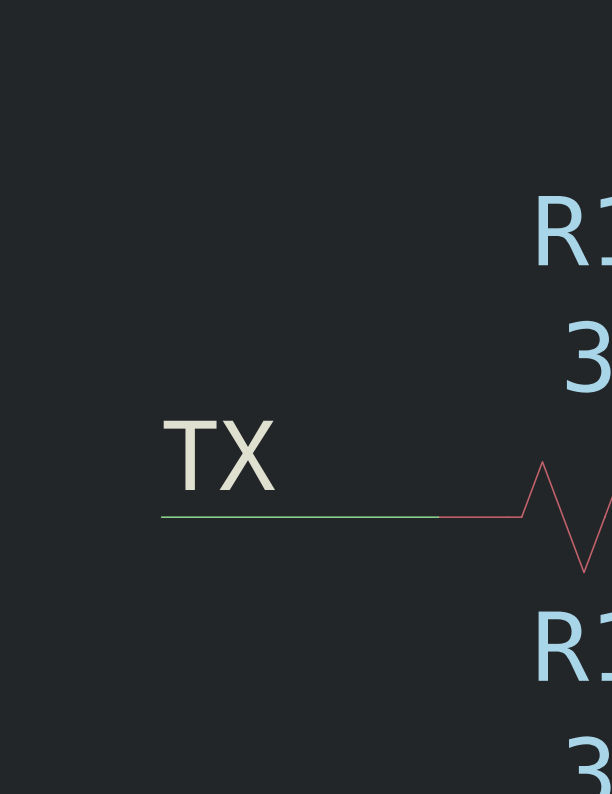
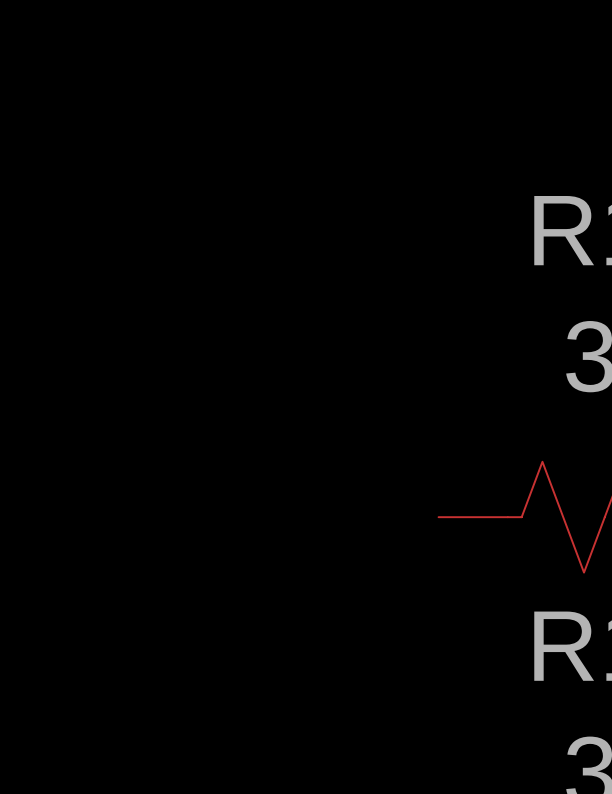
label: TX (219, 455) -> none
wire: (161, 517) (438, 517) -> none

